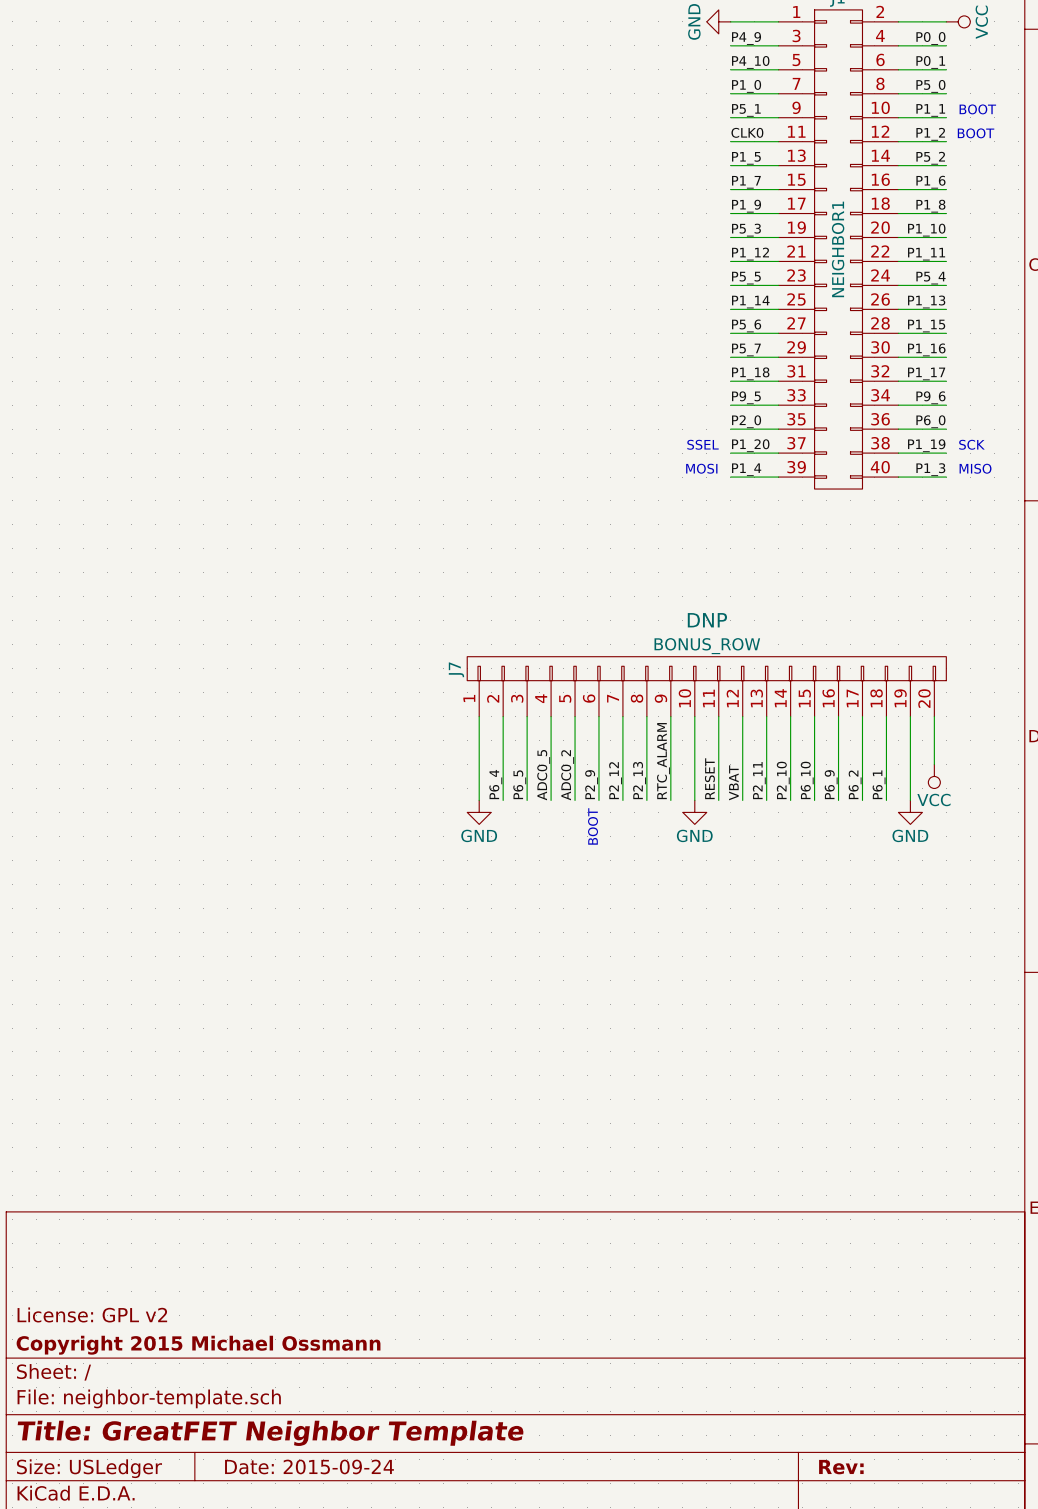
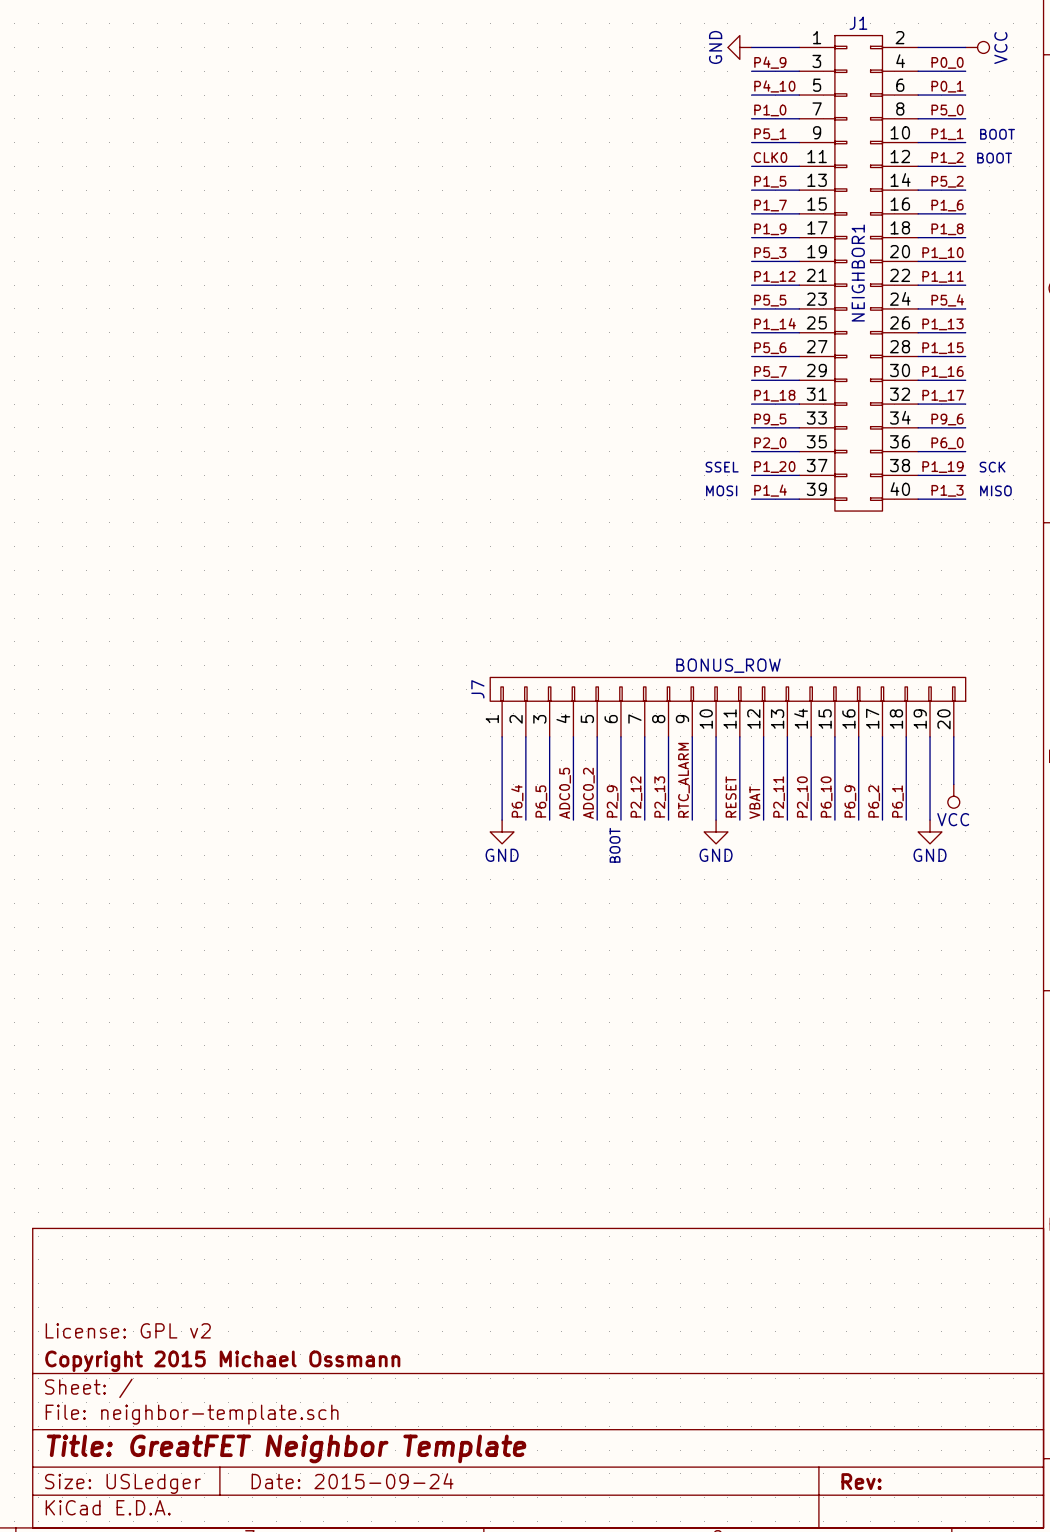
J7 text: DNP (707, 620) -> none

